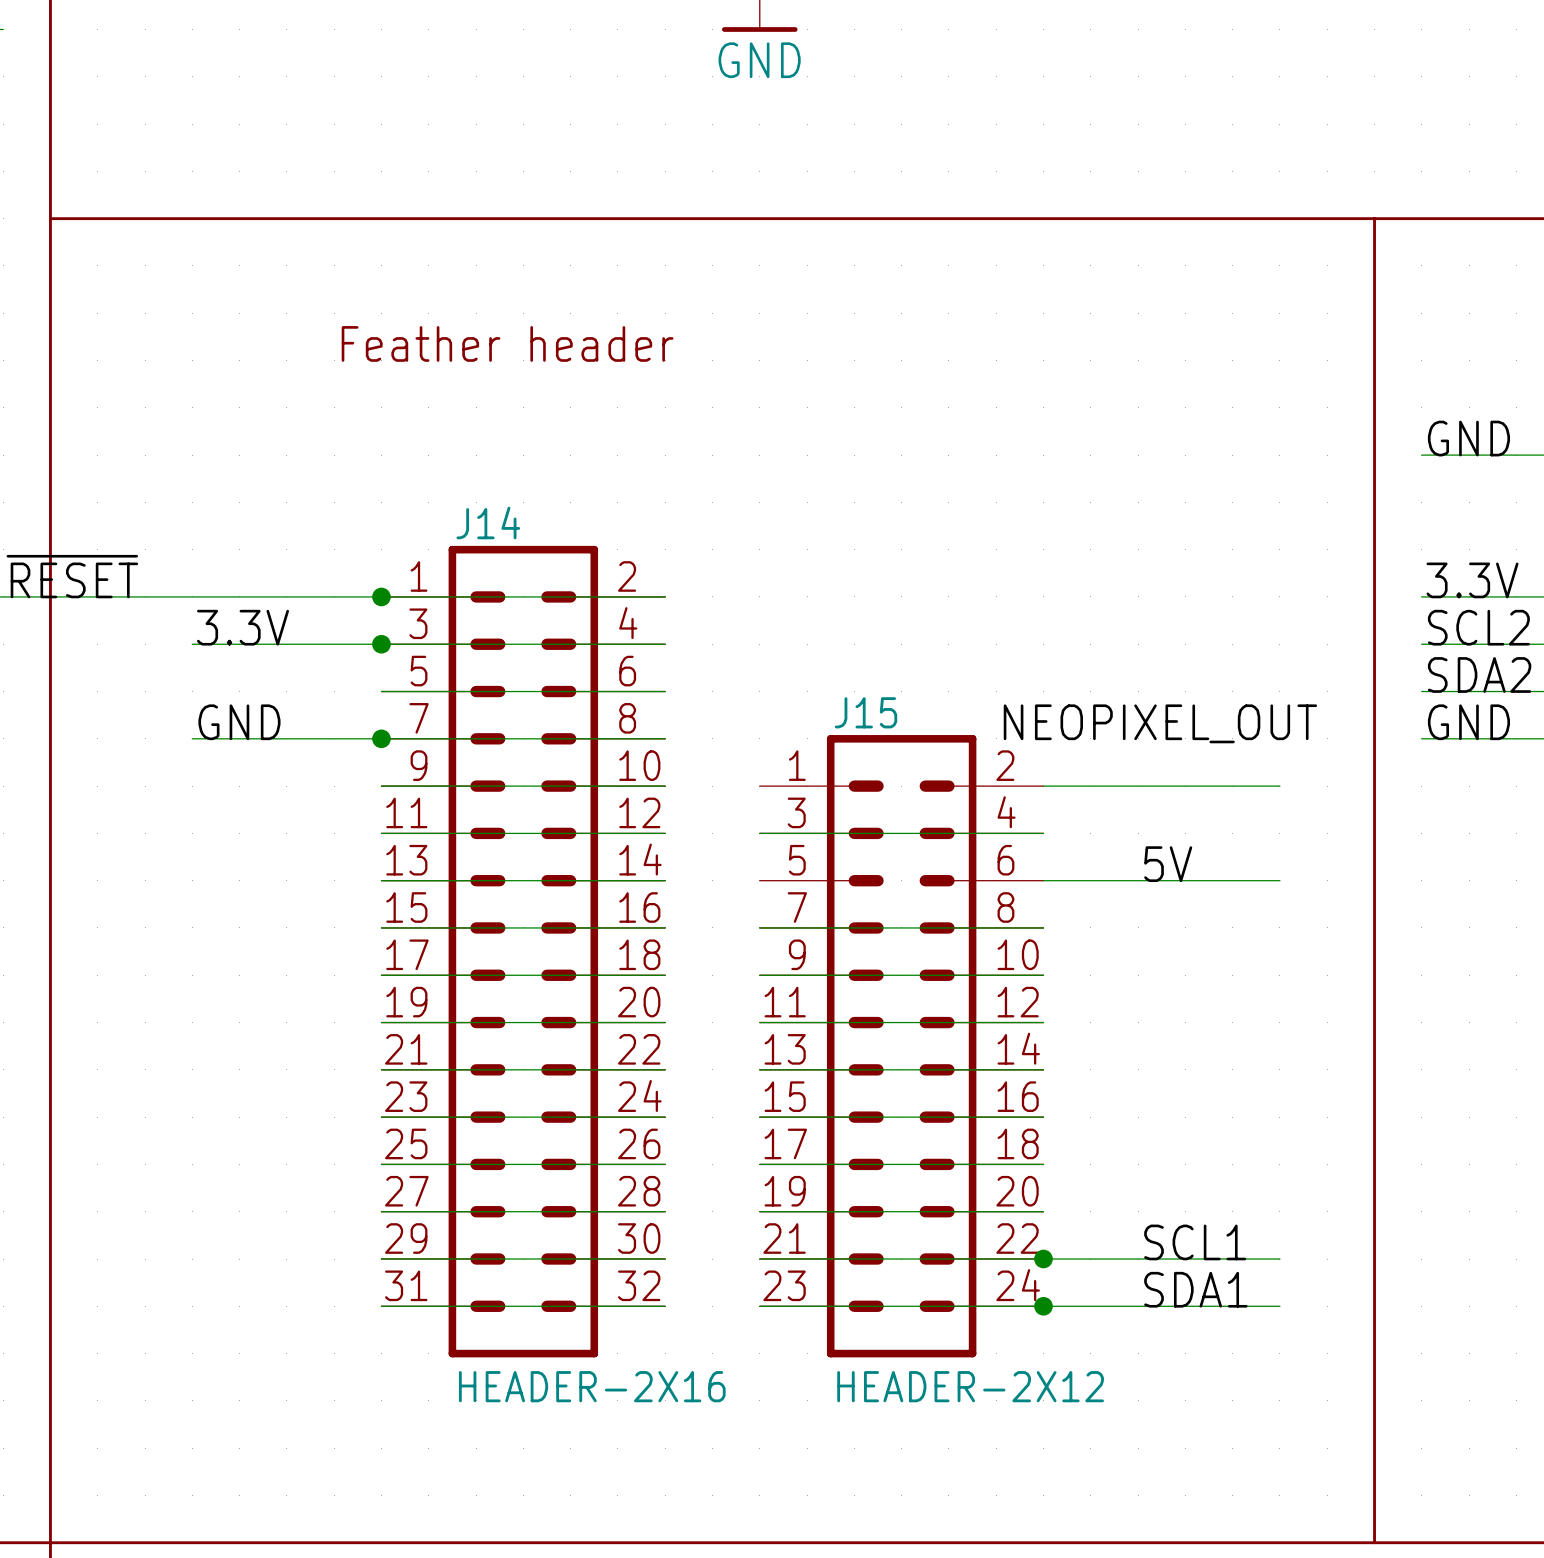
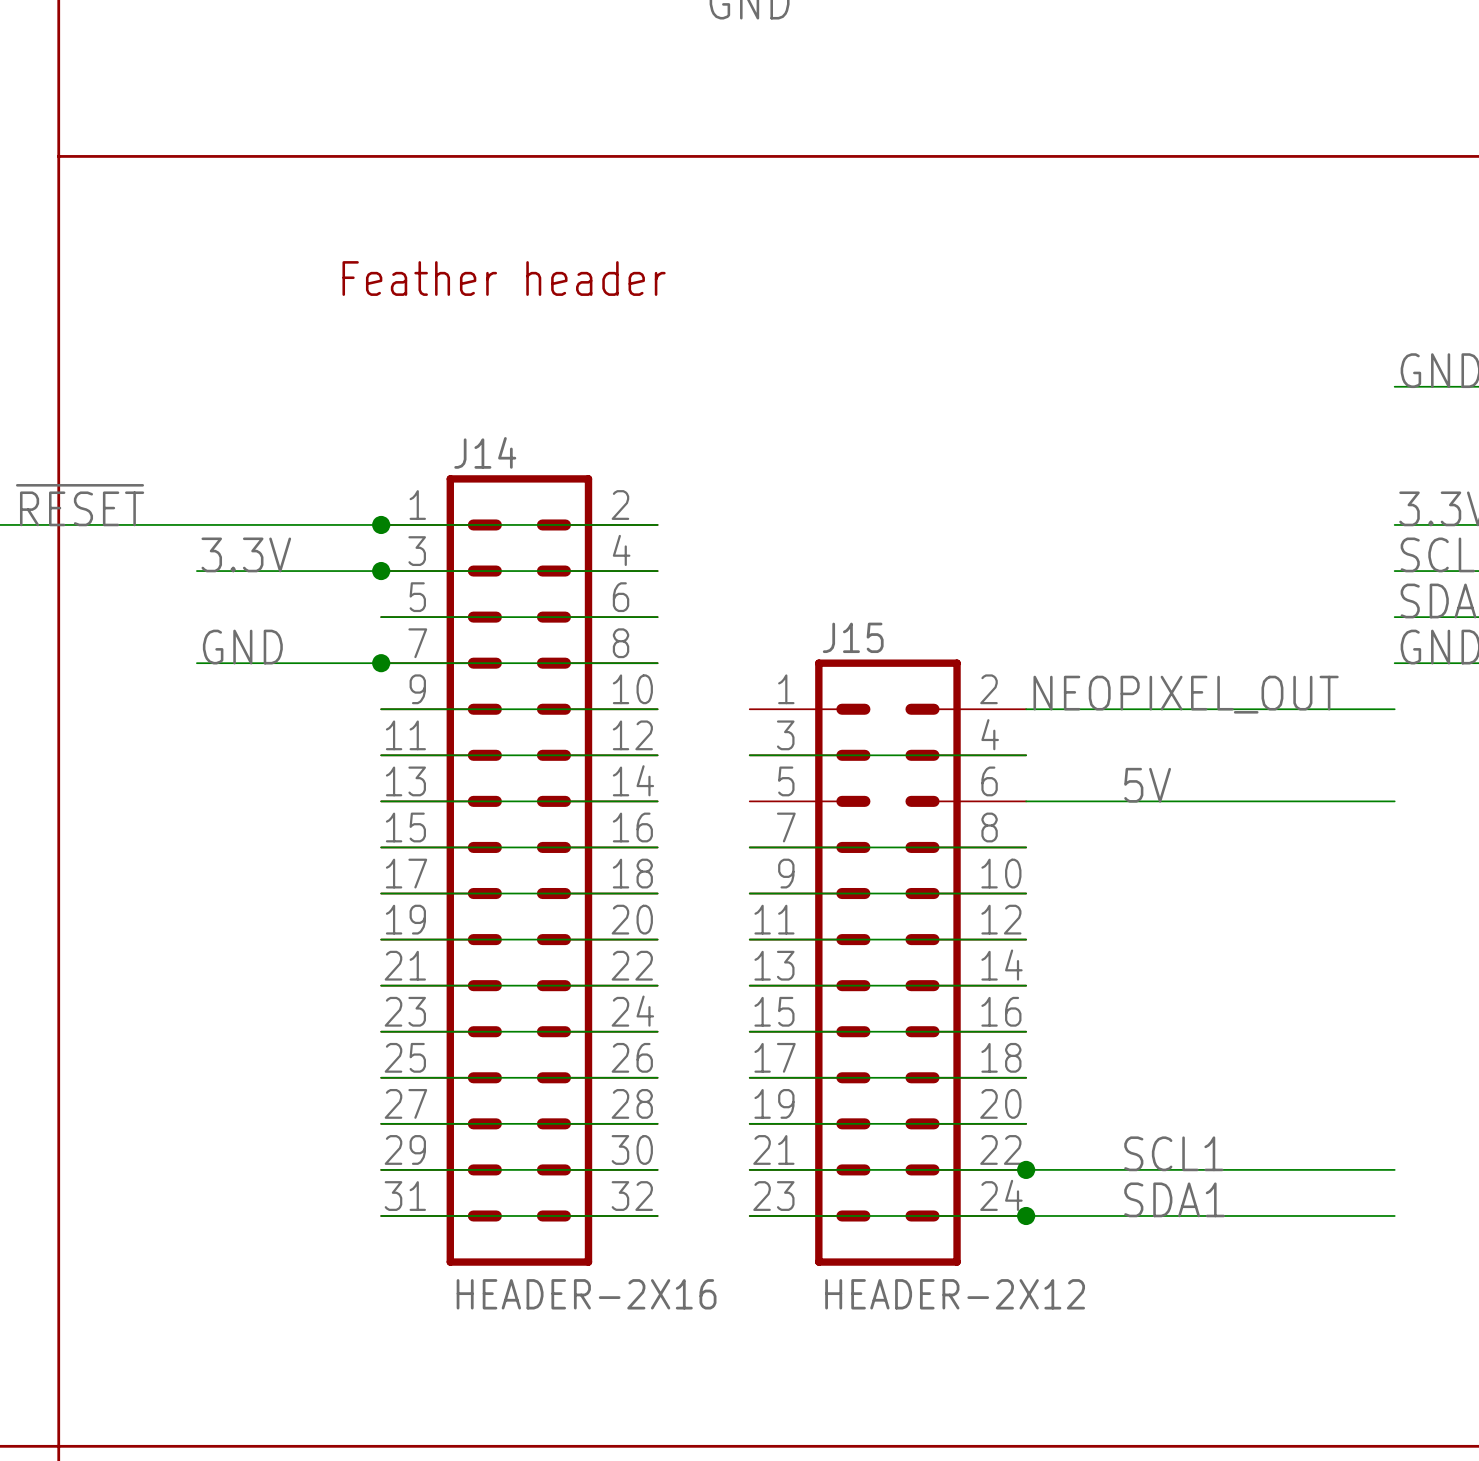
line: (1374, 218) (1374, 1542) -> none
label position: NEOPIXEL_OUT (1160, 723) -> NEOPIXEL_OUT (1186, 694)
wire: none -> (1256, 709) (1394, 709)
wire: none -> (1256, 801) (1394, 801)
wire: none -> (1256, 1169) (1394, 1169)
wire: none -> (1256, 1215) (1394, 1215)

